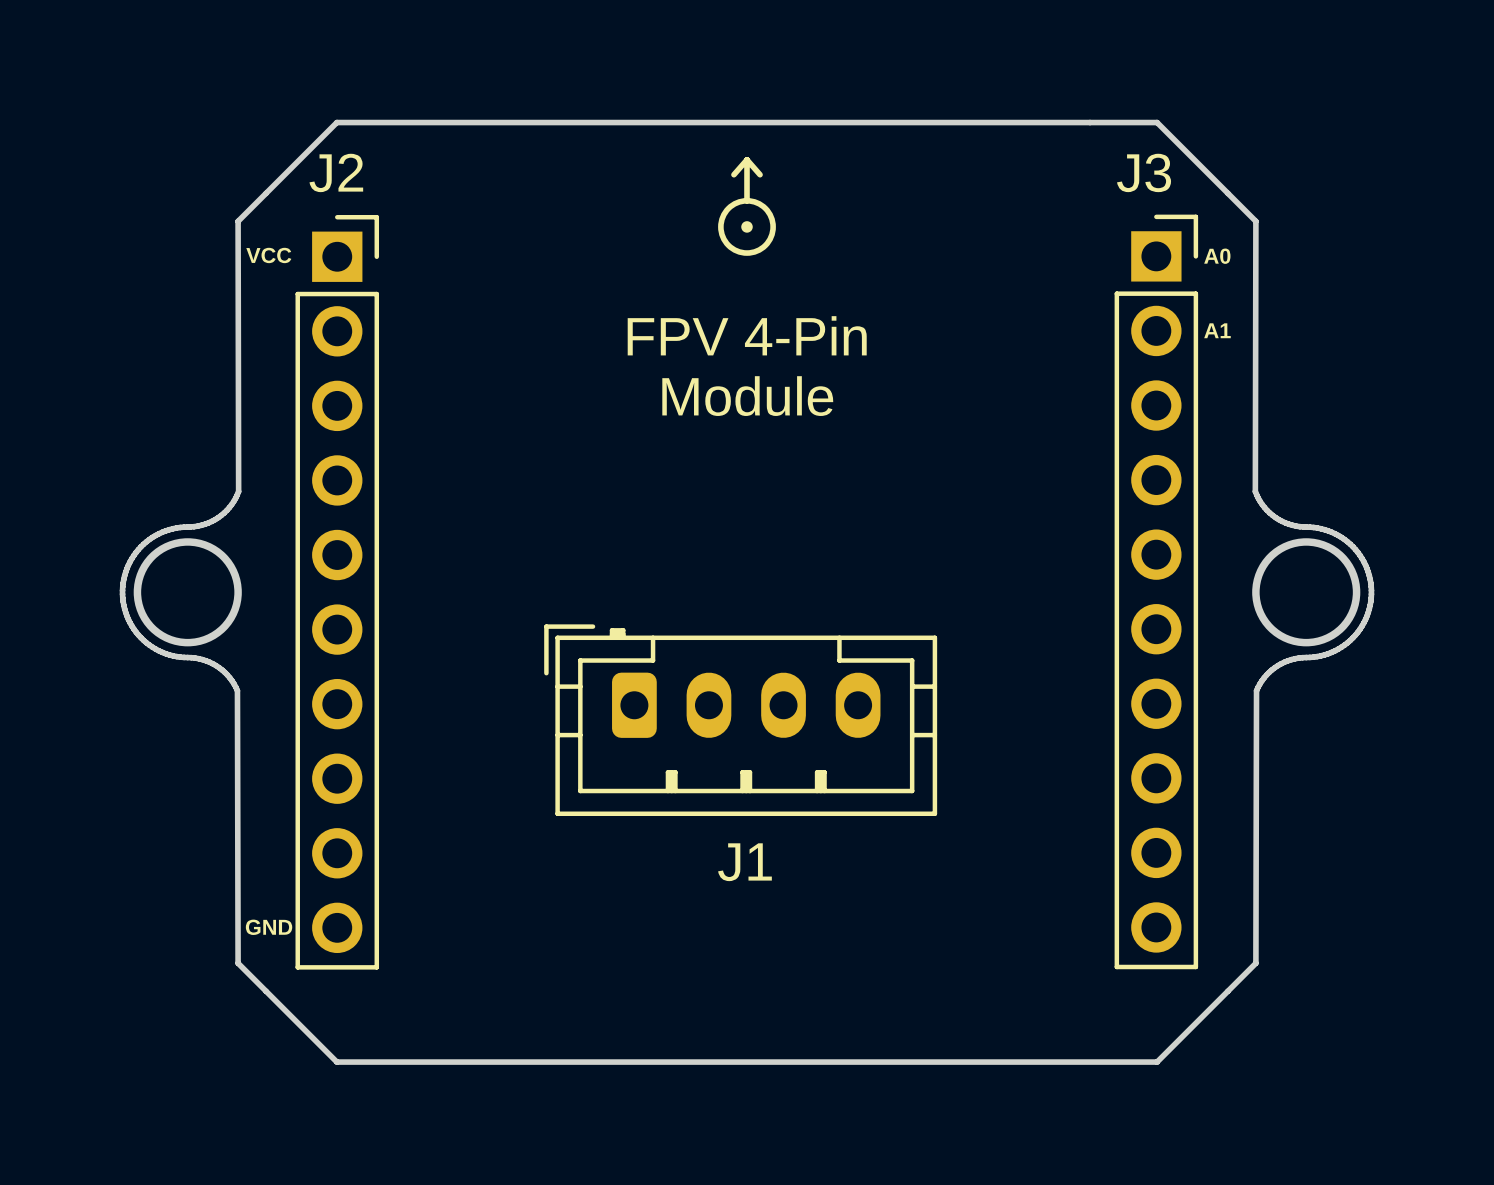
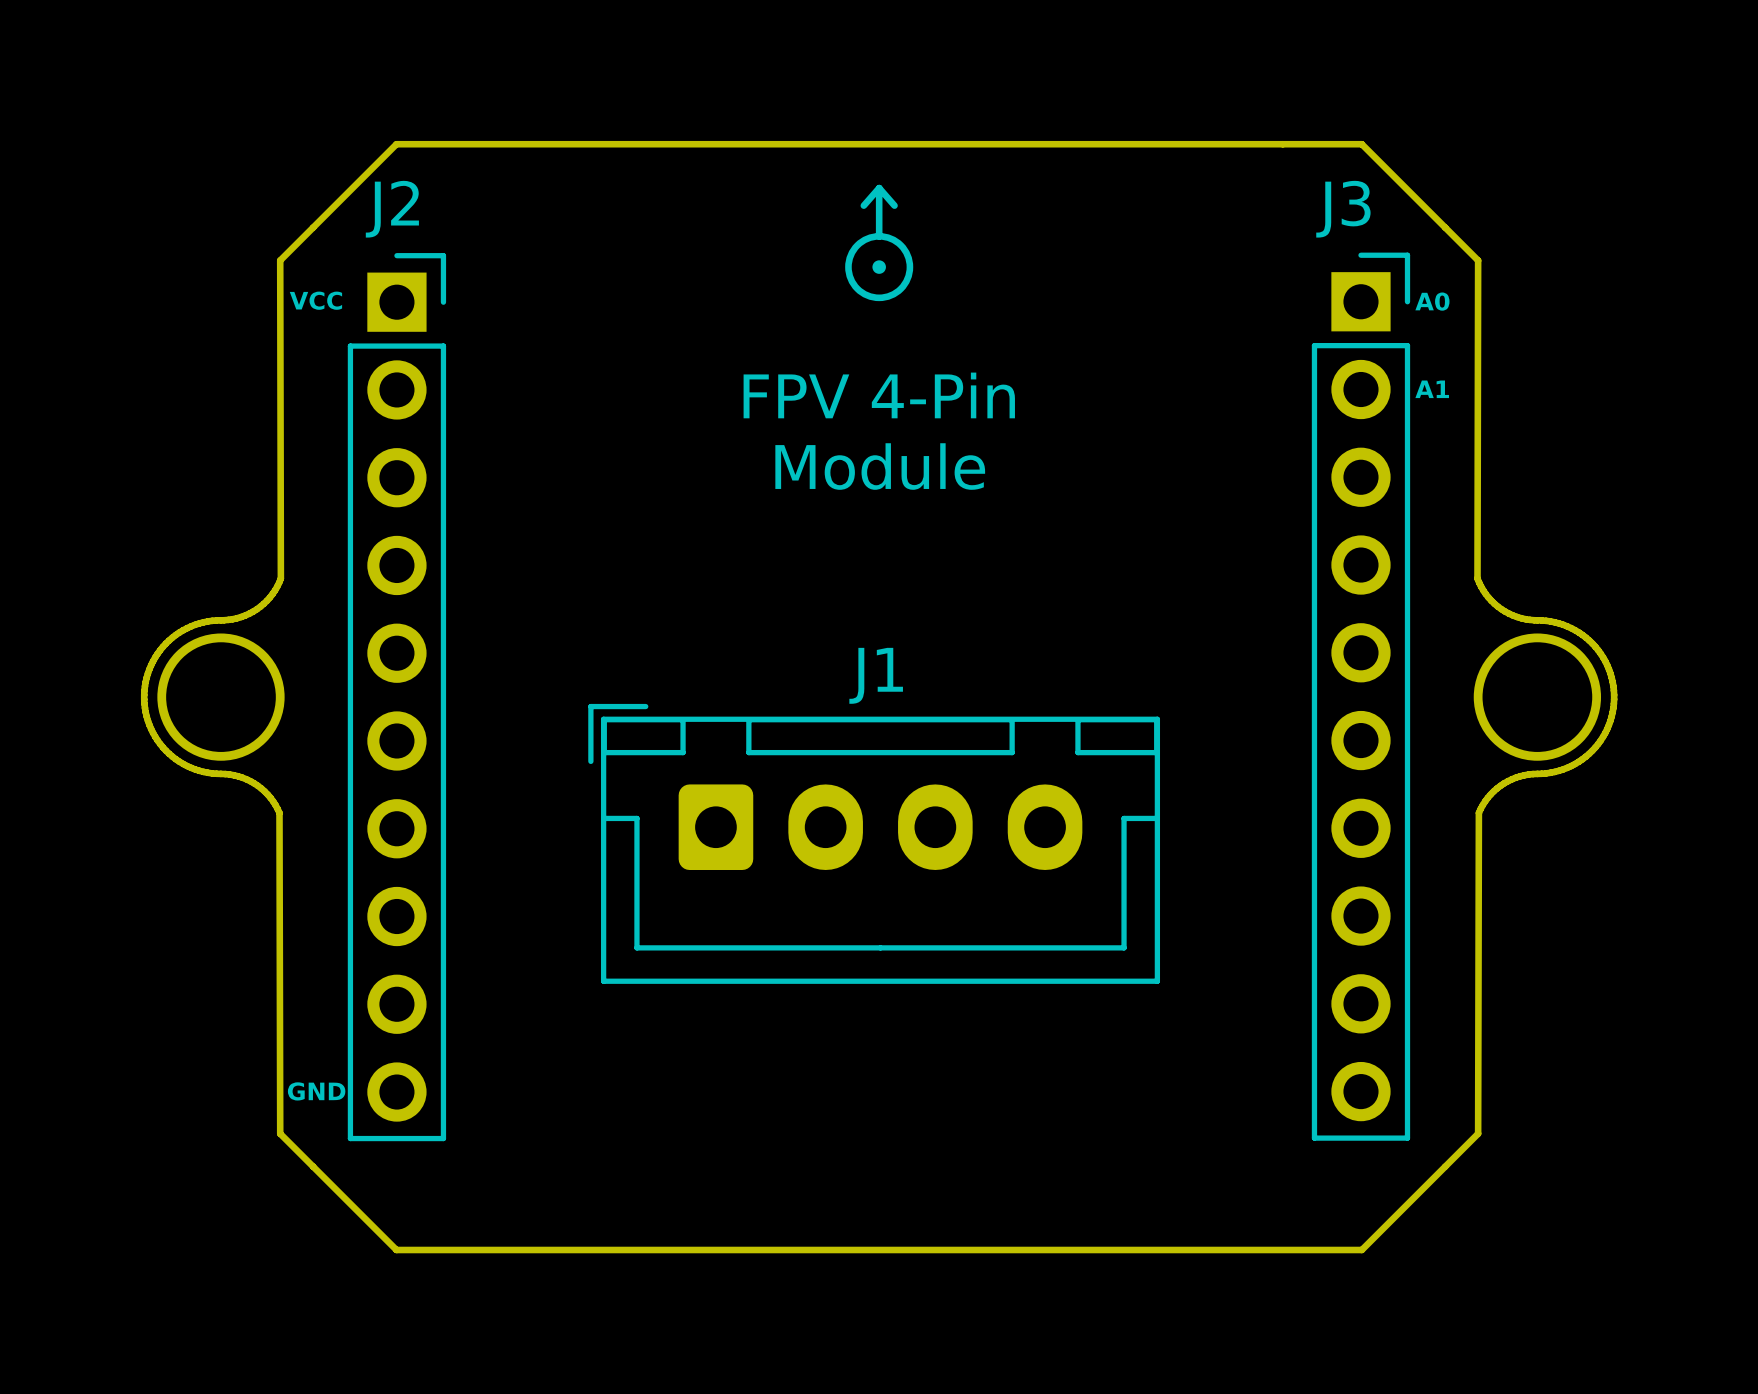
J1 footprint: [544, 624, 938, 816] -> [588, 703, 1161, 984]
J1 name position: J1 (744, 862) -> J1 (876, 675)

